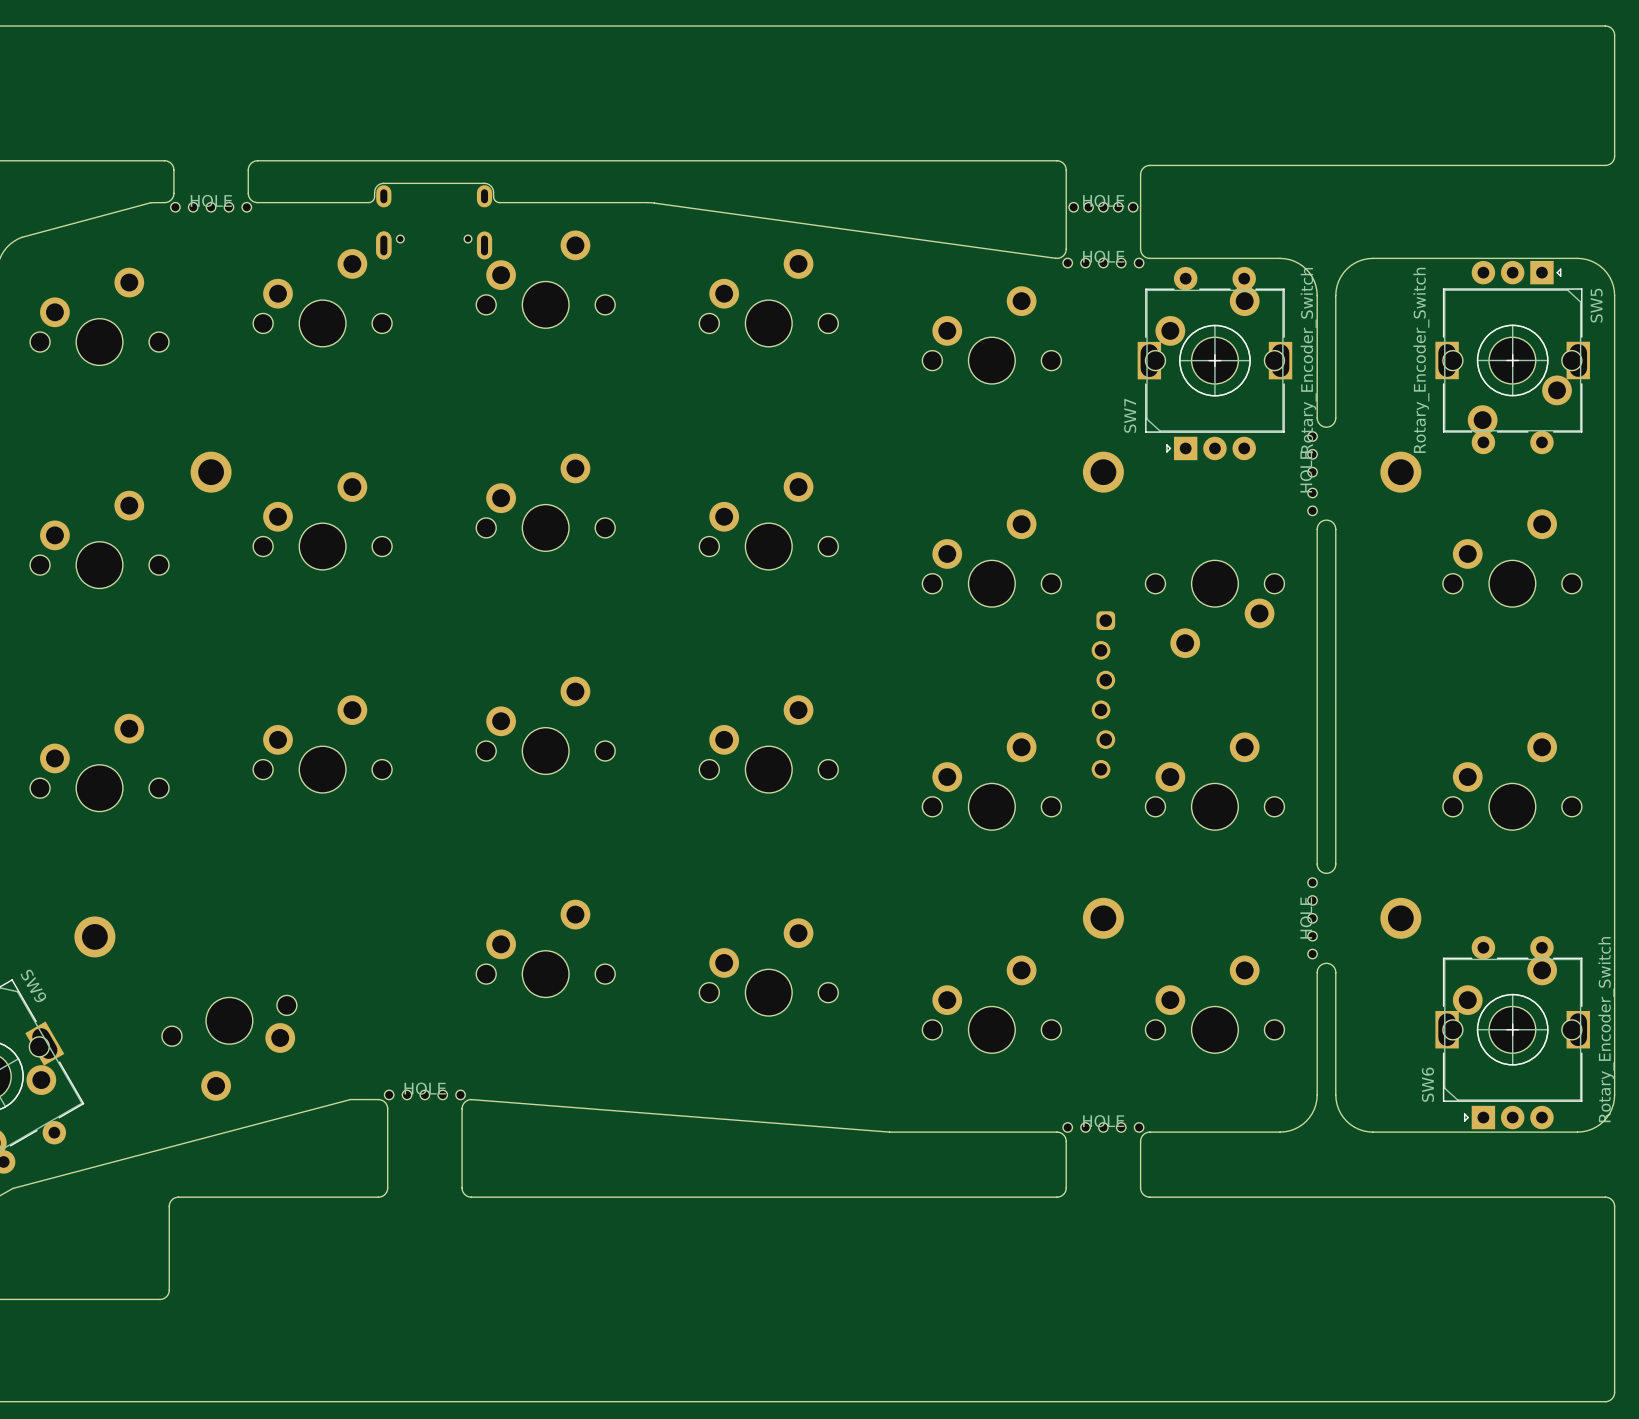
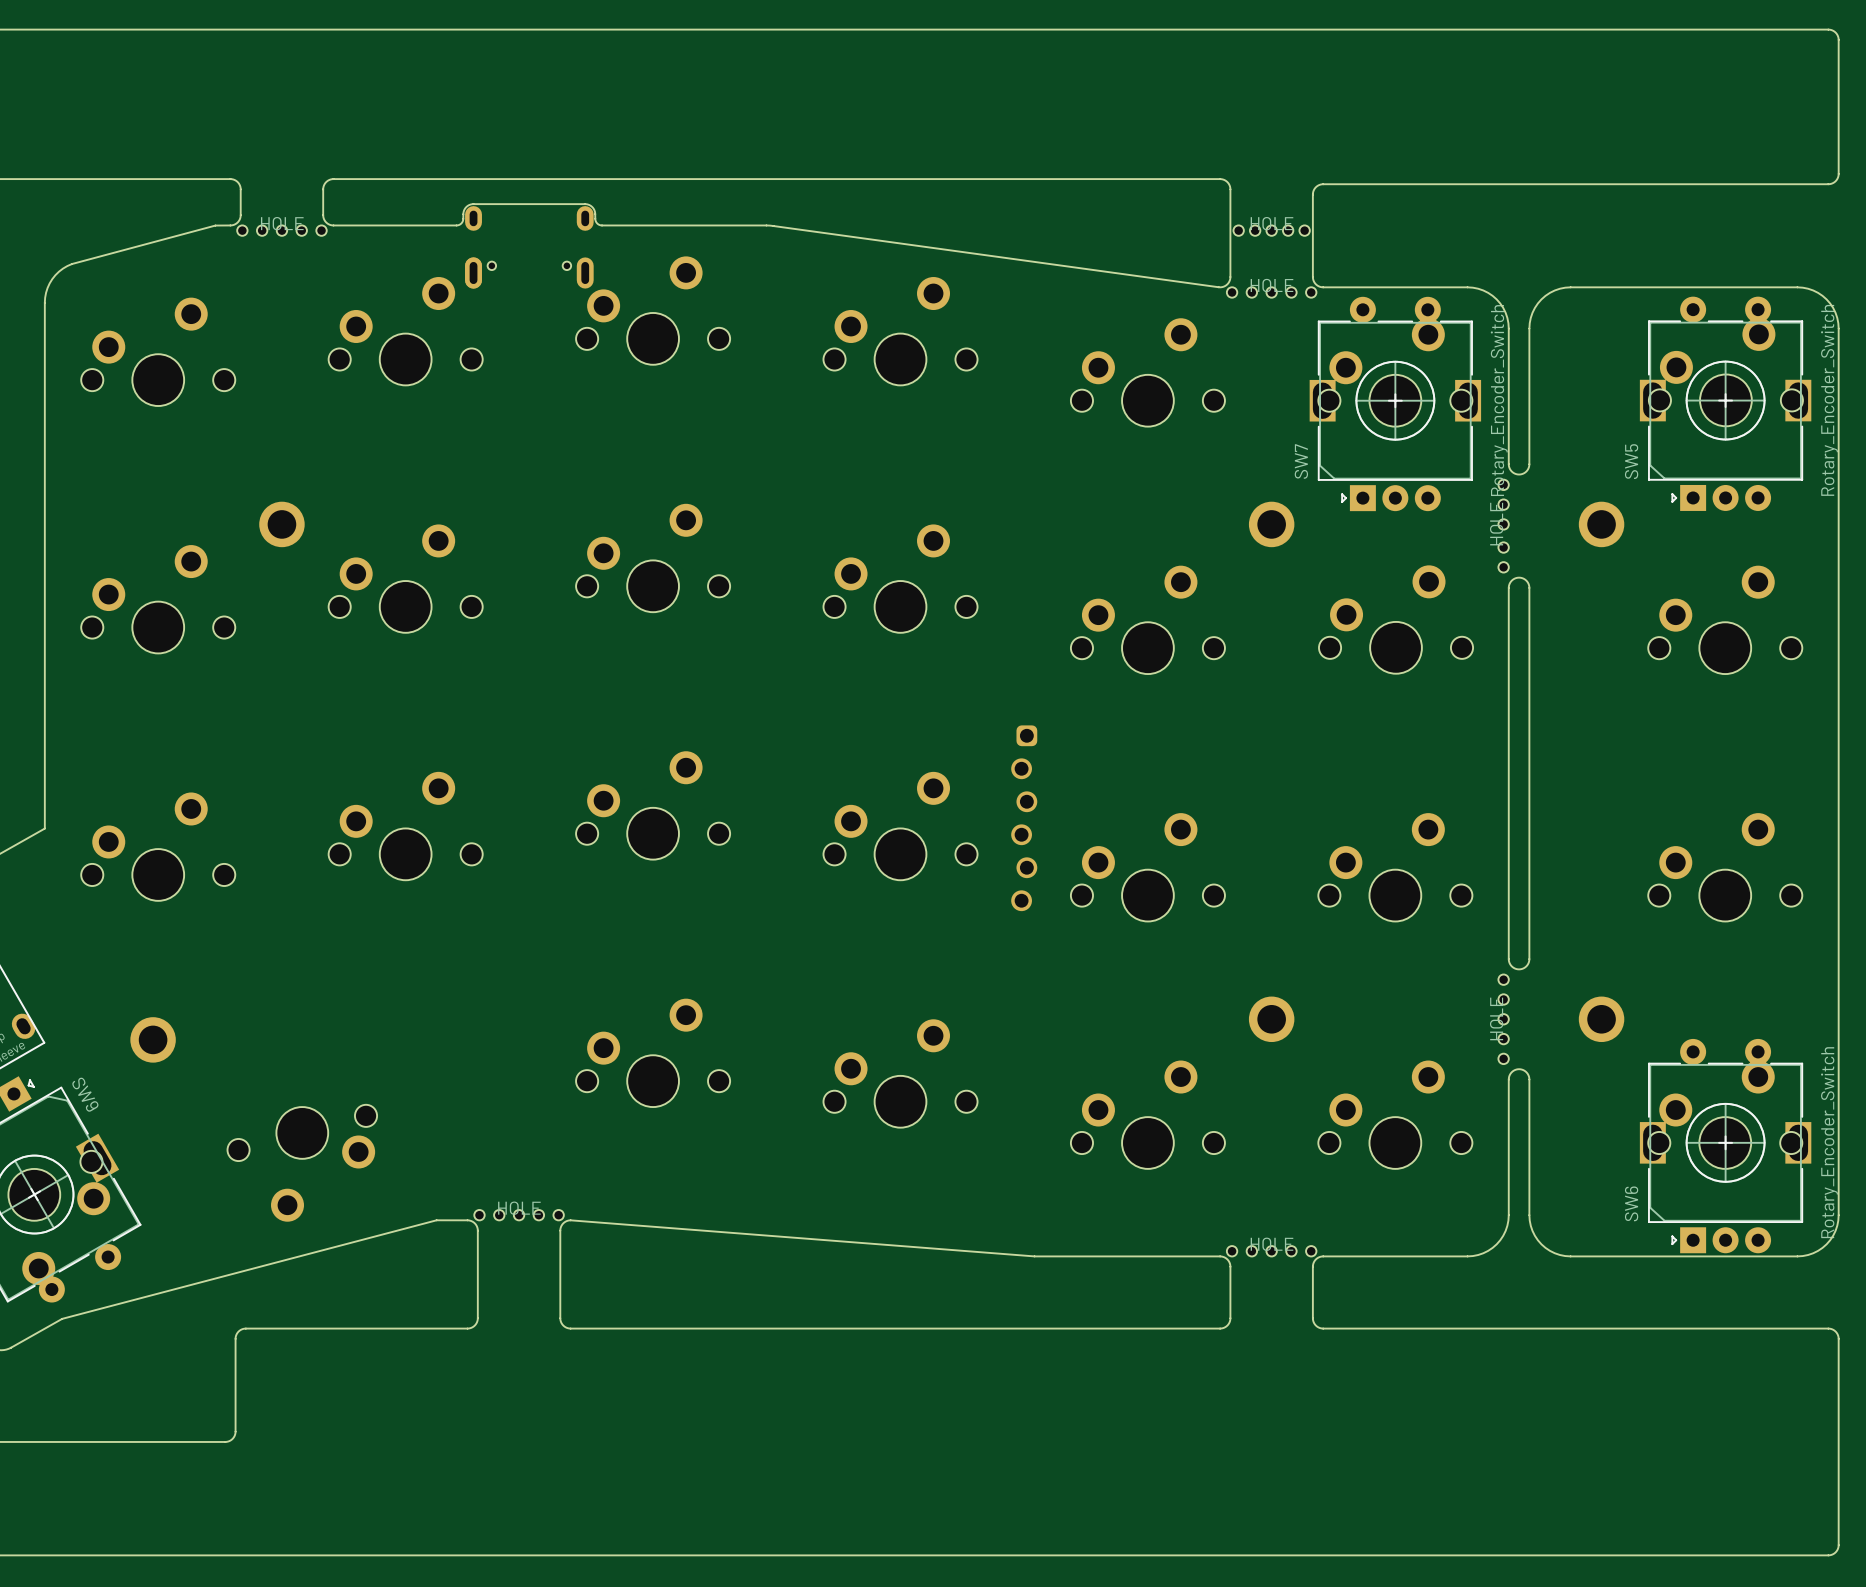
SW5 rotation: 0° (1512, 357) -> 180° (1725, 403)
part rotation: 0° (1512, 386) -> 180° (1725, 372)
part rotation: 0° (1214, 609) -> 180° (1396, 619)
part position: (1103, 694) -> (1024, 818)

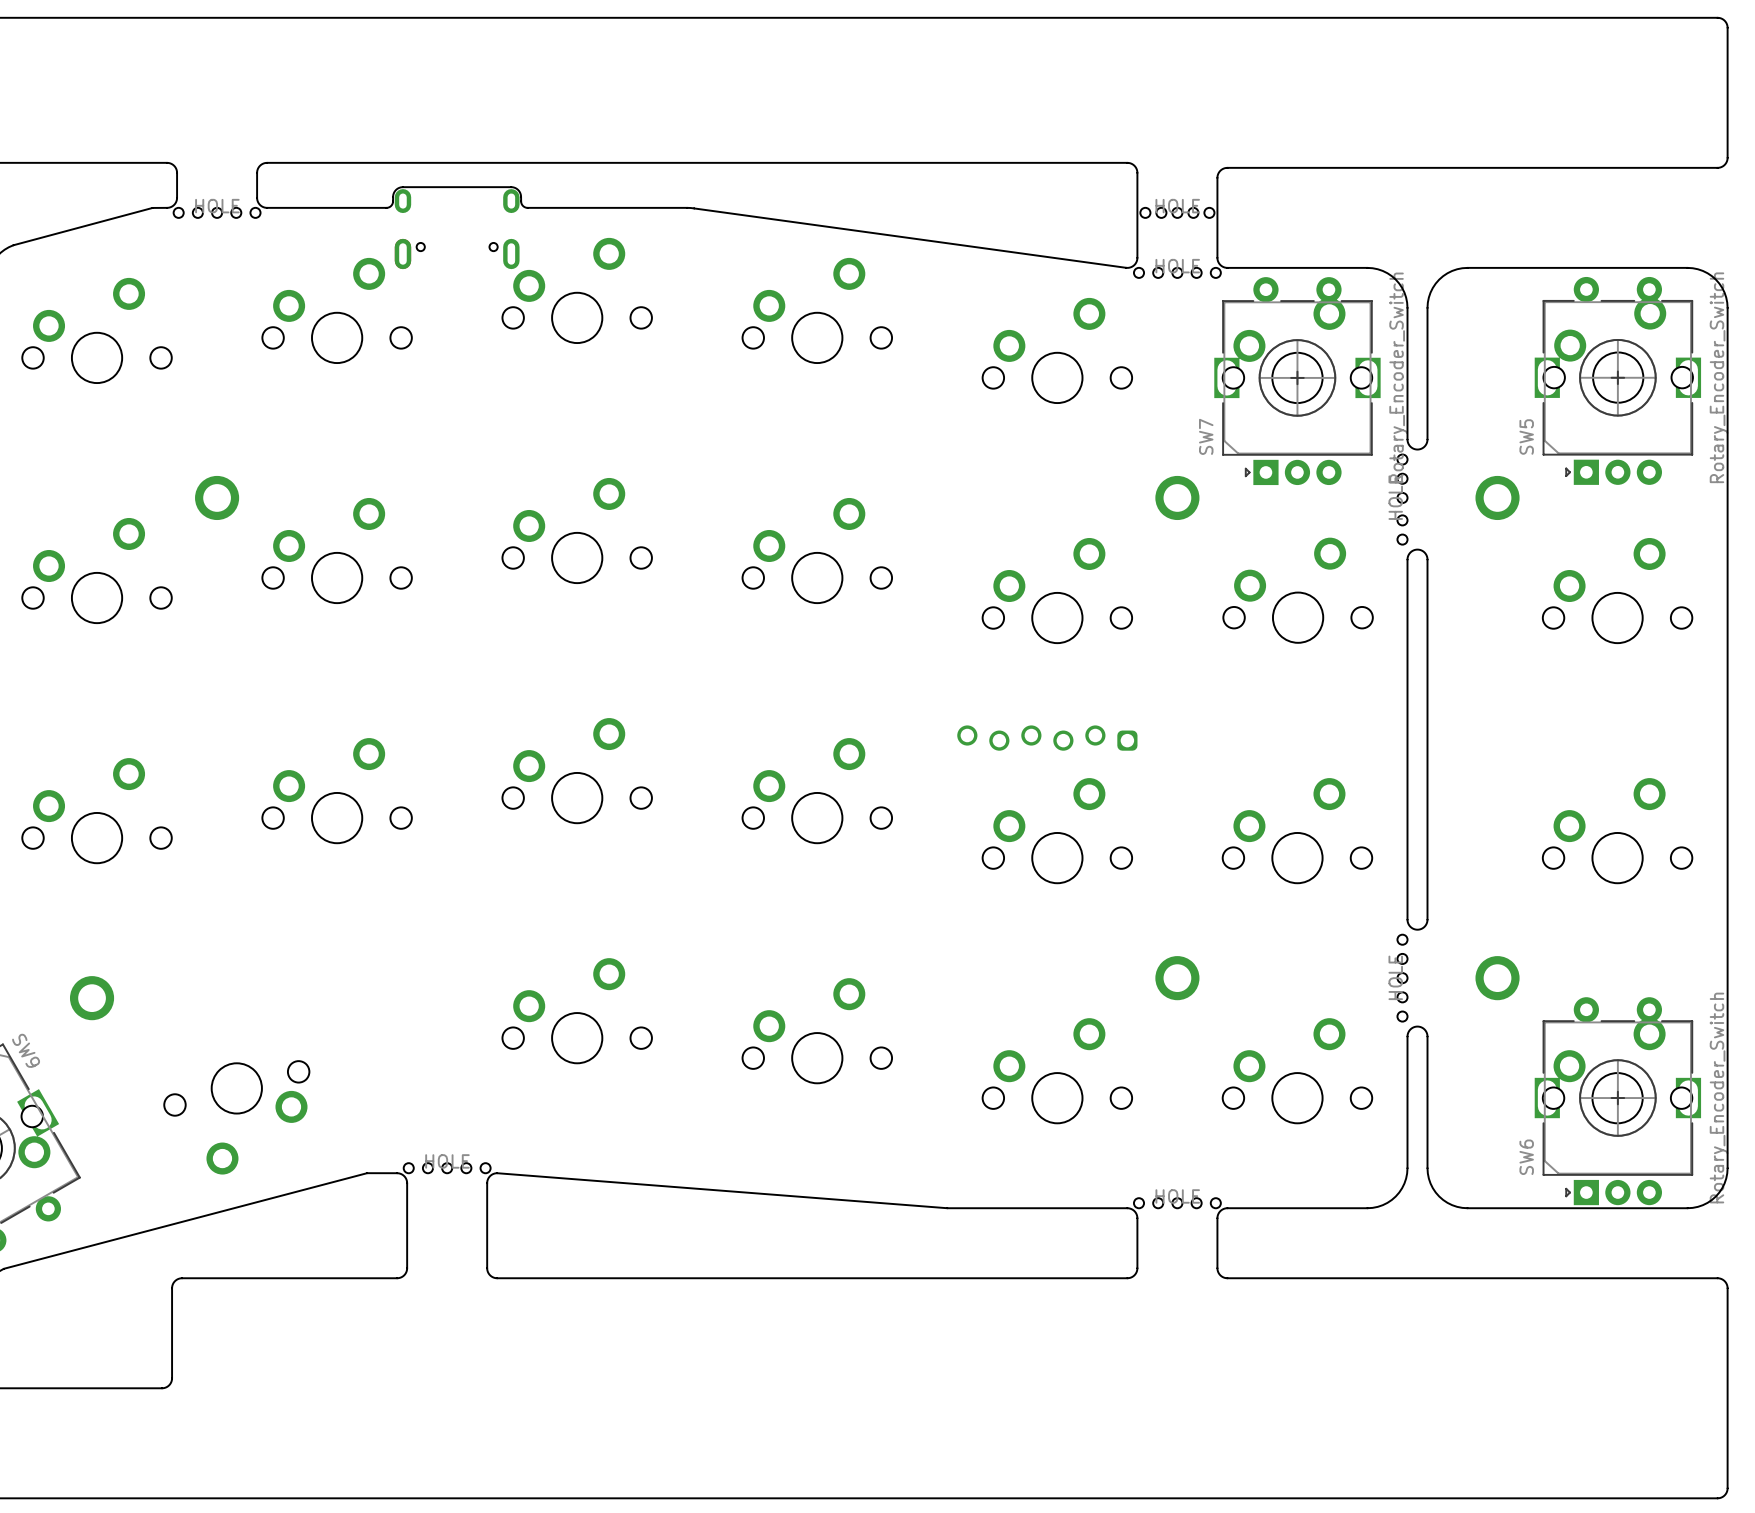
part rotation: 0° (1024, 818) -> 90° clockwise (1047, 738)
part position: (1024, 818) -> (1047, 738)

